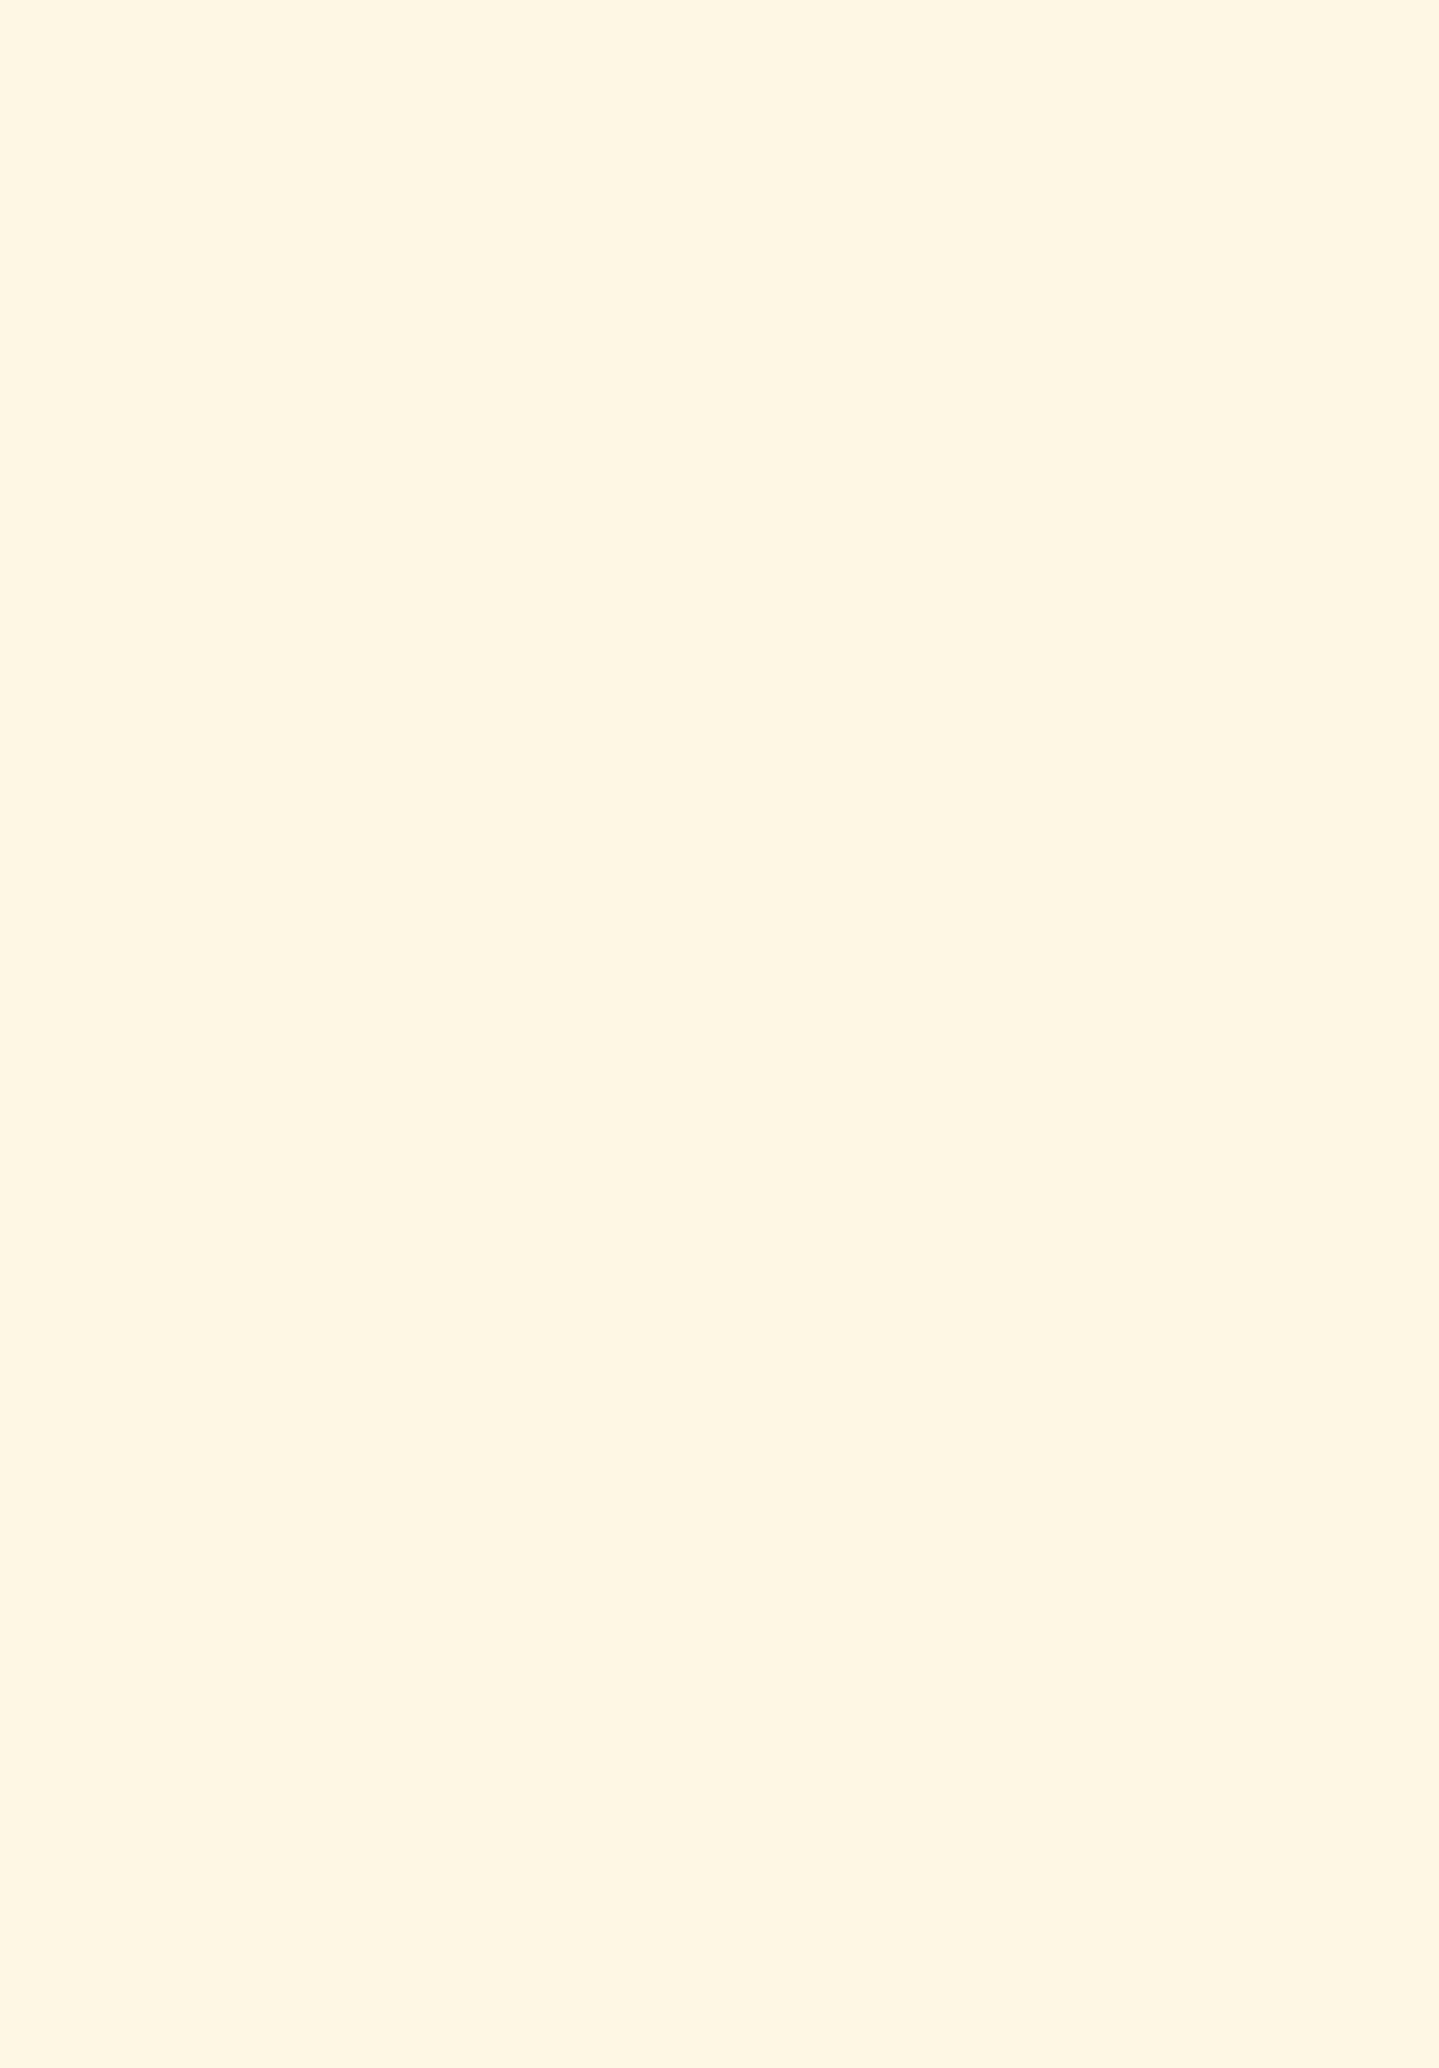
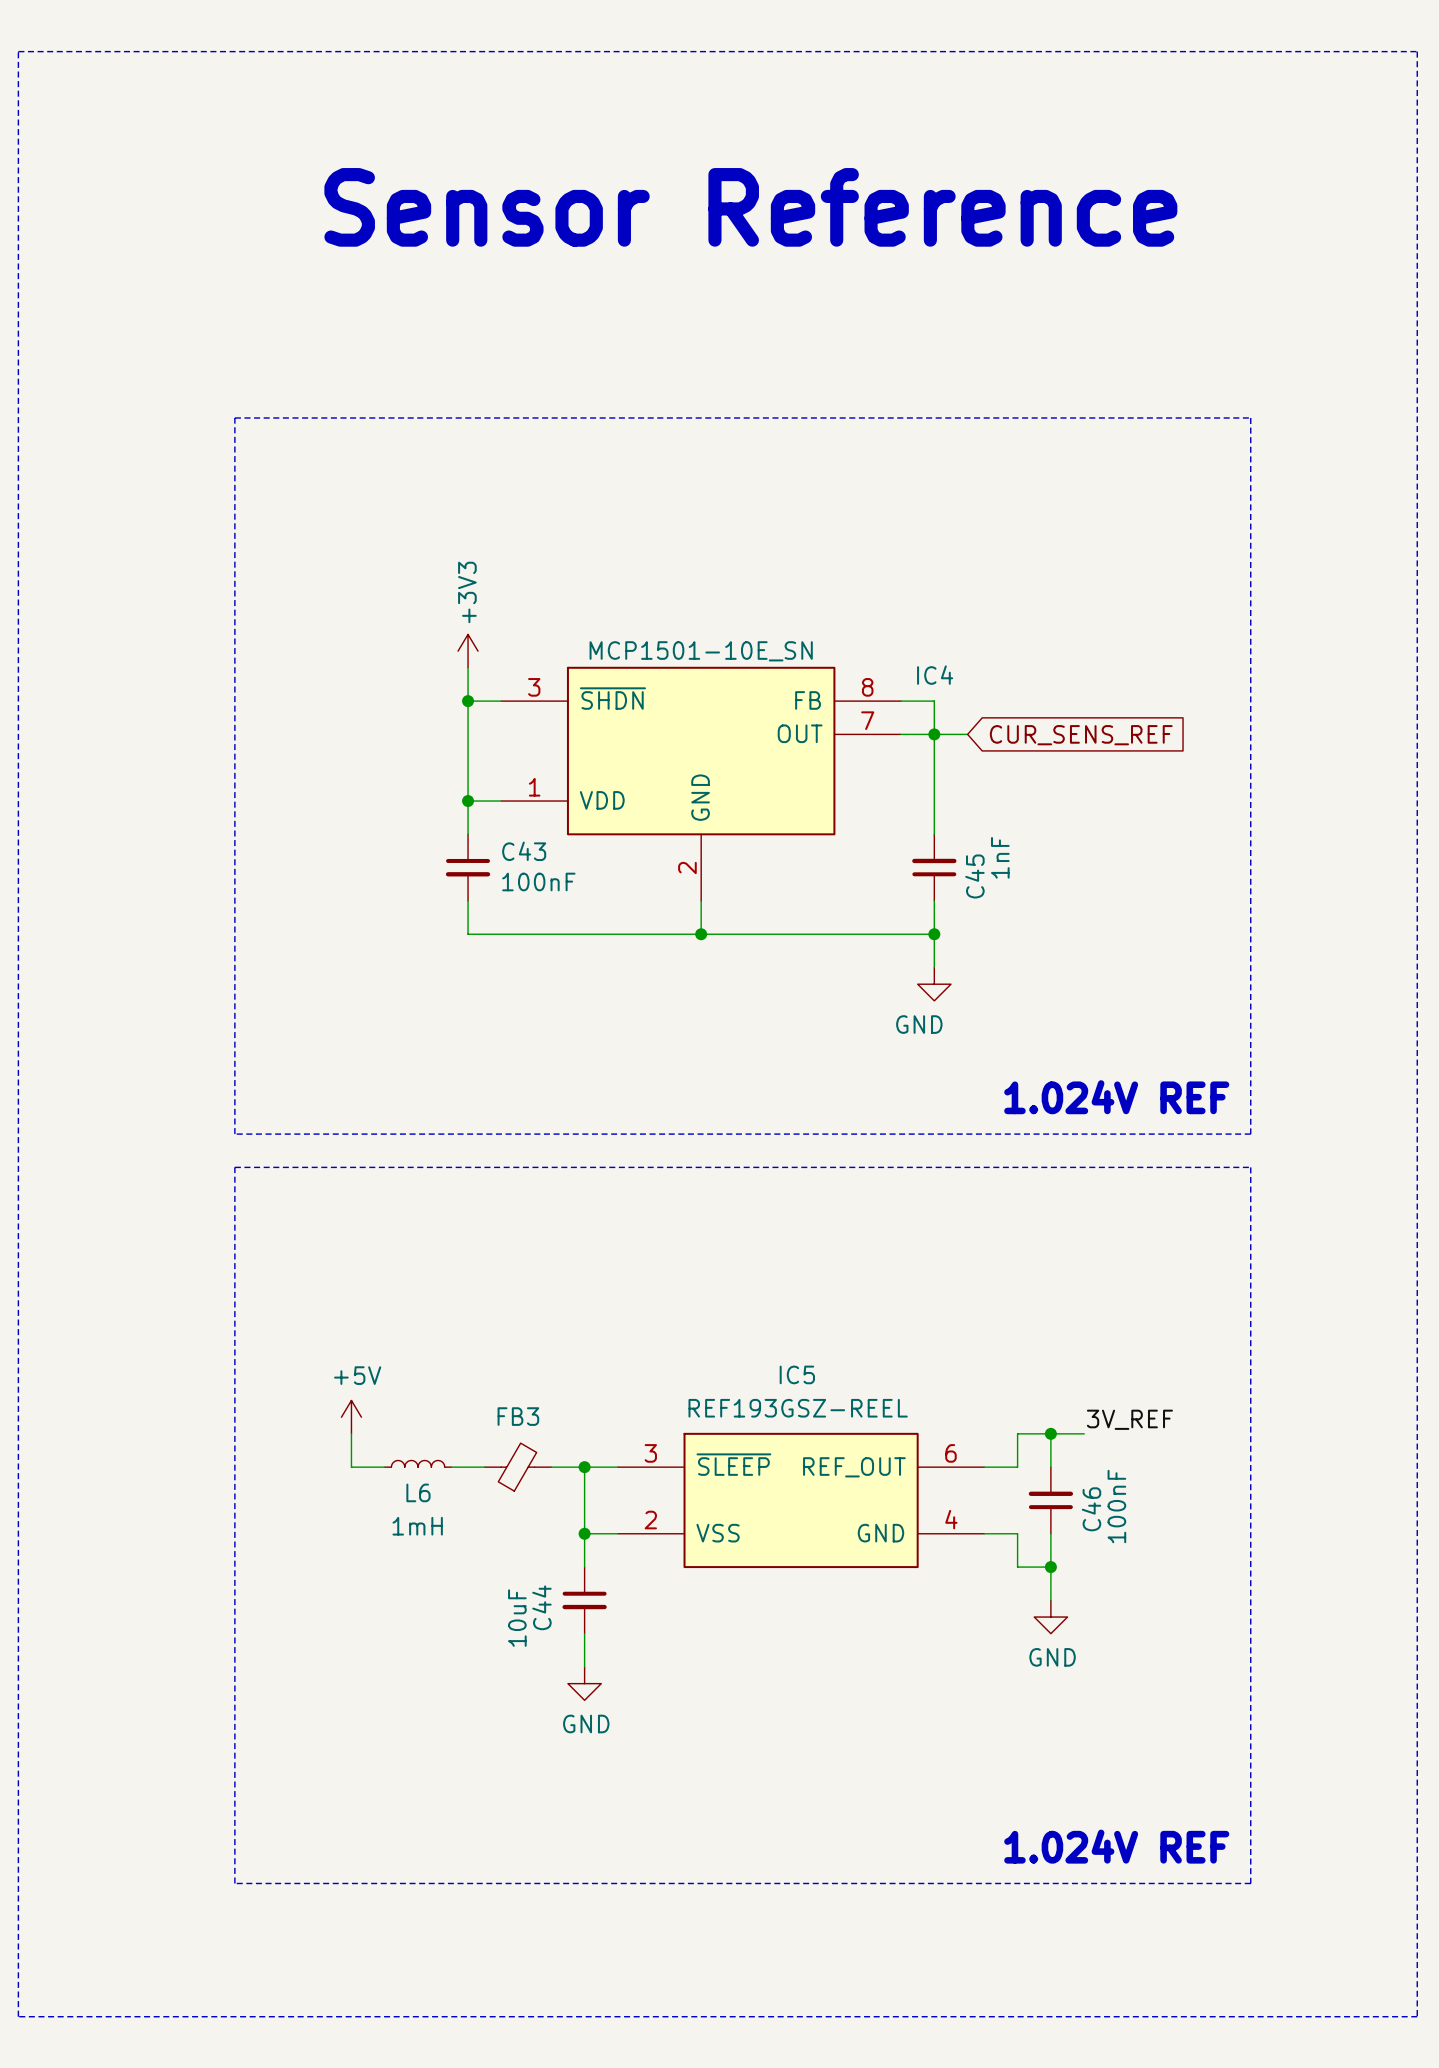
line: none -> (18, 51) (1417, 51) (1417, 2016) (18, 2016) (18, 51)
text: none -> Sensor Reference (750, 207)
line: none -> (234, 417) (1250, 417) (1250, 1134) (234, 1134) (234, 417)
power symbol: none -> +3V3 (468, 651)
wire: none -> (468, 667) (468, 834)
wire: none -> (468, 701) (501, 701)
junction: none -> (468, 701)
wire: none -> (901, 701) (934, 701) (934, 834)
wire: none -> (901, 734) (967, 734)
junction: none -> (934, 734)
global label: none -> CUR_SENS_REF (1081, 735)
IC4: none -> MCP1501-10E_SN (701, 783)
wire: none -> (468, 801) (501, 801)
junction: none -> (468, 801)
C43: none -> 100nF (468, 867)
C45: none -> 1nF (934, 867)
wire: none -> (468, 900) (468, 934) (934, 934)
wire: none -> (701, 900) (701, 934)
wire: none -> (934, 900) (934, 967)
junction: none -> (701, 934)
junction: none -> (934, 934)
power symbol: none -> GND (934, 984)
text: none -> 1.024V REF (1116, 1097)
line: none -> (234, 1167) (234, 1883) (1250, 1883) (1250, 1167) (234, 1167)
power symbol: none -> +5V (351, 1417)
label: none -> 3V_REF (1129, 1419)
wire: none -> (351, 1433) (351, 1467) (384, 1467)
wire: none -> (1050, 1433) (1050, 1467)
junction: none -> (1050, 1433)
wire: none -> (1084, 1433) (1017, 1433) (1017, 1467) (984, 1467)
L6: none -> 1mH (418, 1463)
wire: none -> (451, 1467) (484, 1467)
FB3: none -> (517, 1467)
wire: none -> (551, 1467) (617, 1467)
wire: none -> (584, 1467) (584, 1567)
junction: none -> (584, 1467)
IC5: none -> REF193GSZ-REEL (801, 1500)
C46: none -> 100nF (1050, 1500)
wire: none -> (584, 1533) (617, 1533)
junction: none -> (584, 1533)
wire: none -> (984, 1533) (1017, 1533) (1017, 1567) (1050, 1567)
wire: none -> (1050, 1533) (1050, 1600)
junction: none -> (1050, 1567)
C44: none -> 10uF (584, 1600)
power symbol: none -> GND (1050, 1617)
wire: none -> (584, 1633) (584, 1666)
power symbol: none -> GND (584, 1683)
text: none -> 1.024V REF (1116, 1846)

